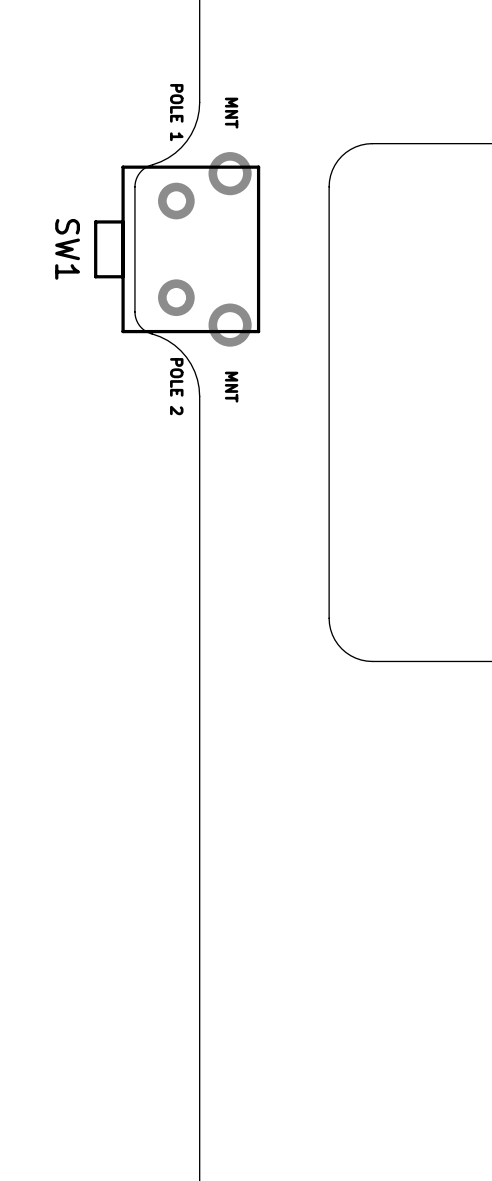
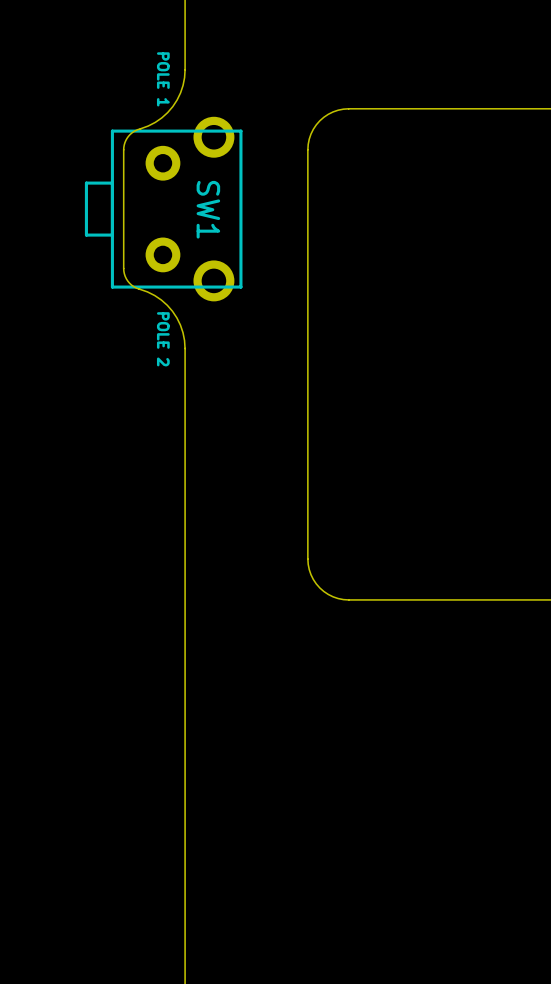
SW1 text: MNT (231, 113) -> none
SW1 name position: SW1 (67, 249) -> SW1 (208, 209)
SW1 text: MNT (231, 387) -> none

